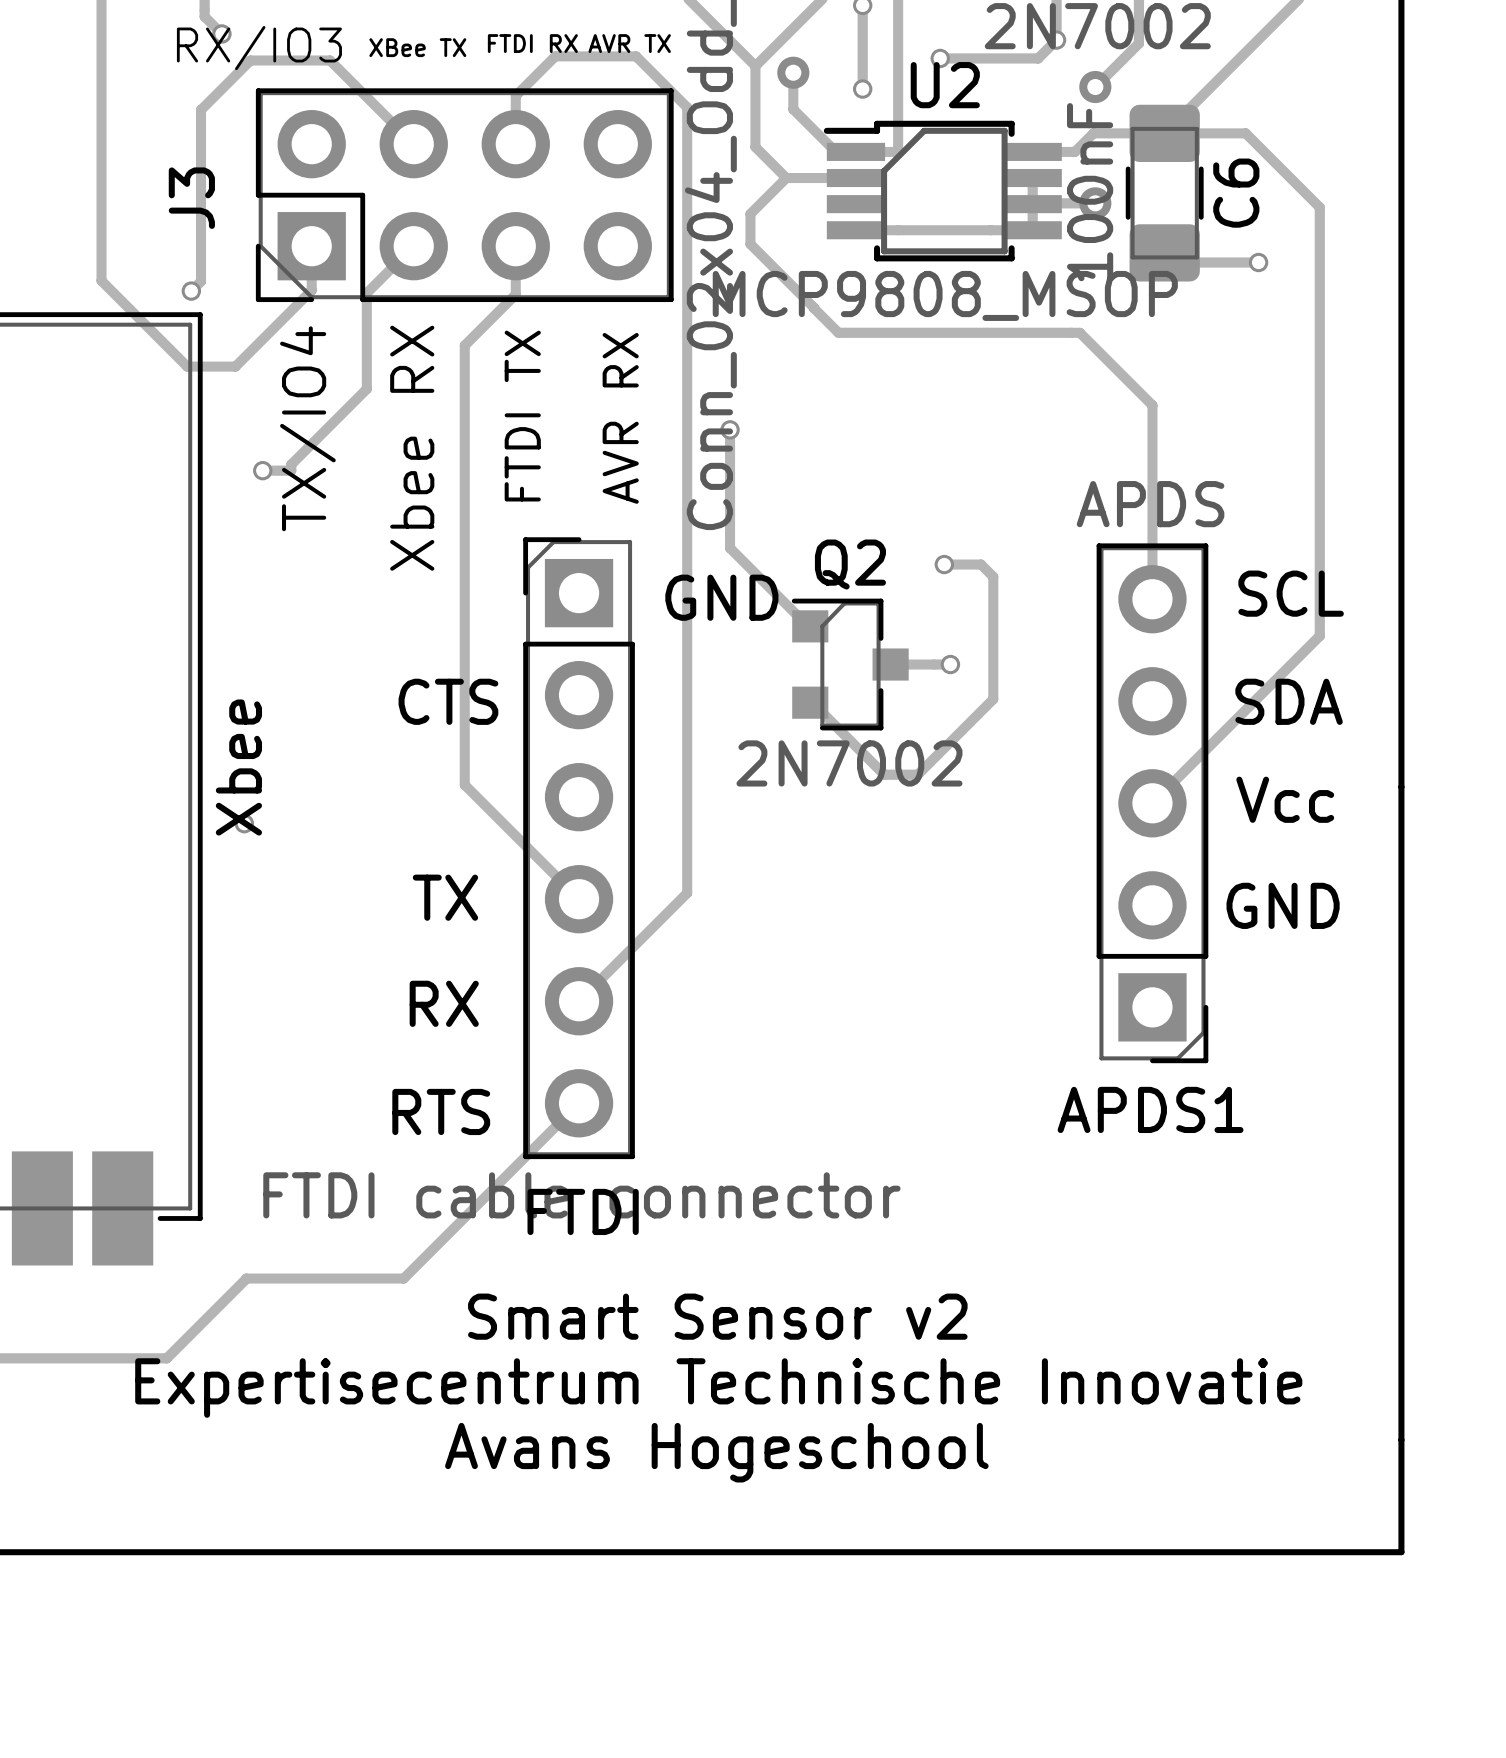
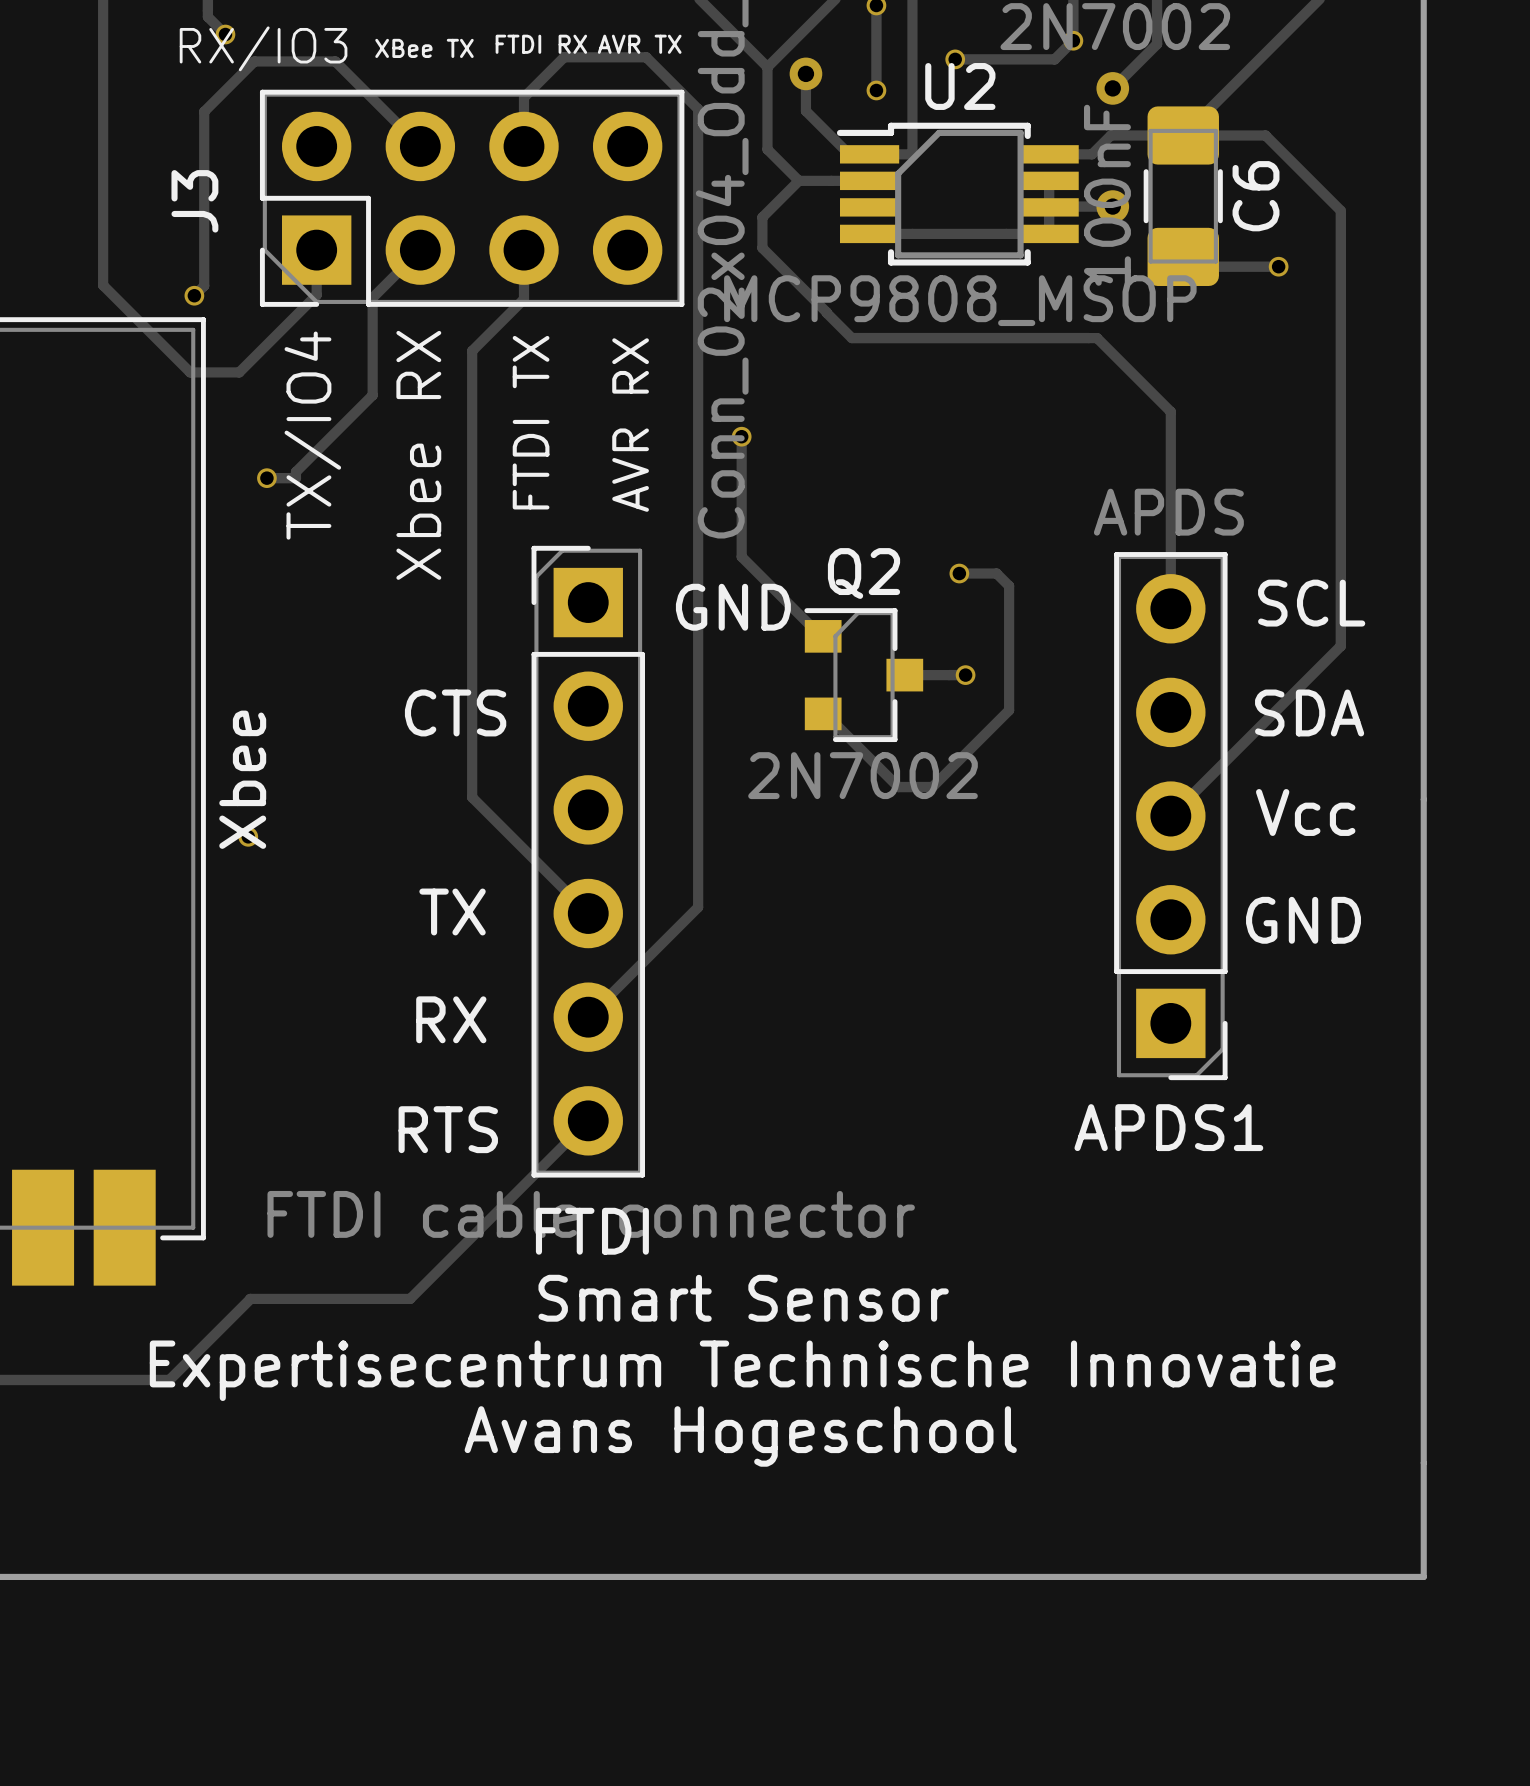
text: Smart Sensor v2 (717, 1316) -> Smart Sensor (743, 1298)
text position: Expertisecentrum Technische Innovatie (718, 1388) -> Expertisecentrum Technische Innovatie (742, 1370)
text position: Avans Hogeschool (716, 1452) -> Avans Hogeschool (740, 1436)

